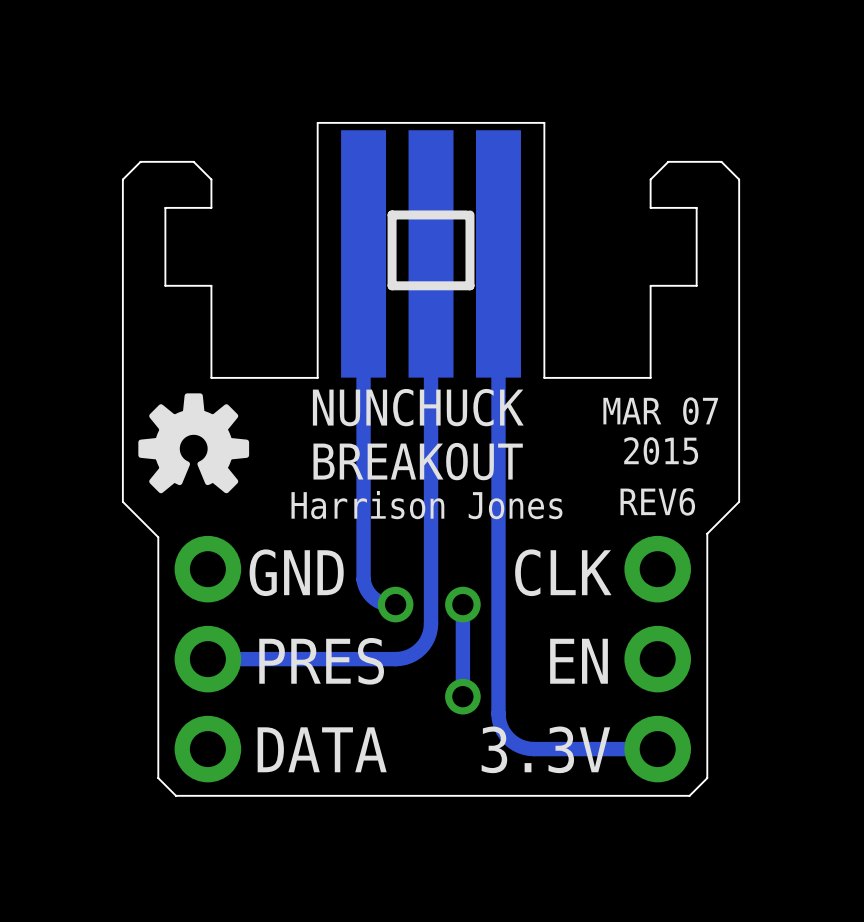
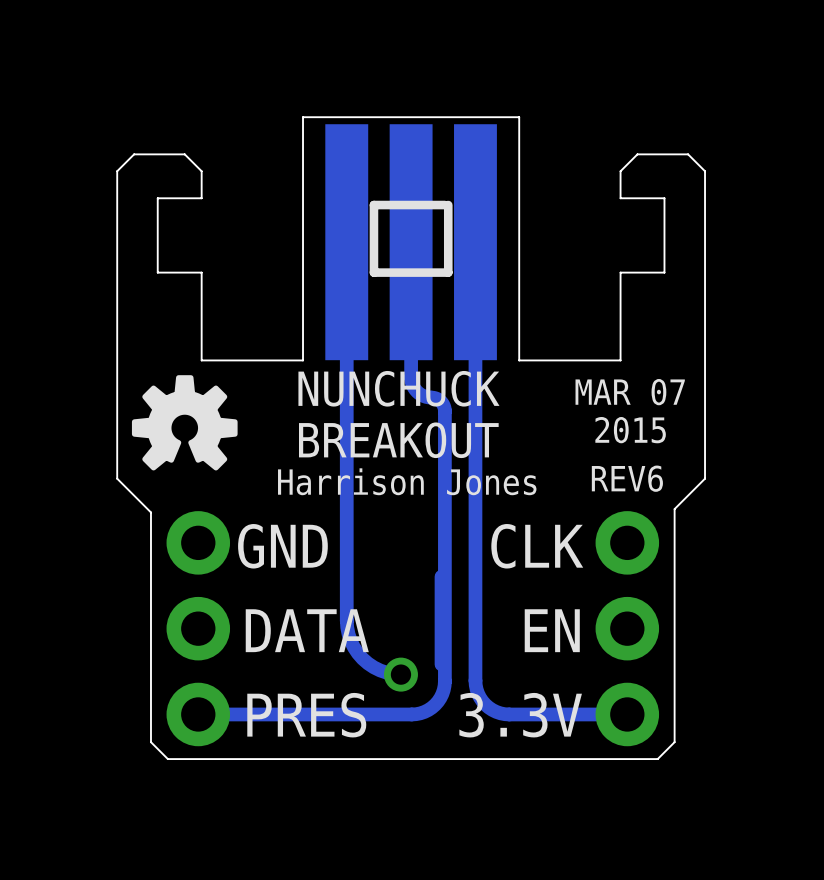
track: (431, 395) (431, 623) (429, 632) (423, 645) (409, 656) (395, 659) (207, 659) -> (411, 377) (412, 385) (417, 391) (423, 396) (438, 399) (444, 409) (444, 681) (440, 697) (428, 710) (416, 714) (198, 714)
track: (363, 579) (367, 590) (374, 598) (384, 603) (395, 604) -> (346, 552) (346, 620) (350, 641) (362, 658) (373, 667) (386, 672) (400, 674)
via: (395, 604) -> none
via: (462, 604) -> none
text: PRES (321, 661) -> DATA (307, 630)
via position: (462, 696) -> (400, 674)
text: DATA (322, 749) -> PRES (306, 715)

